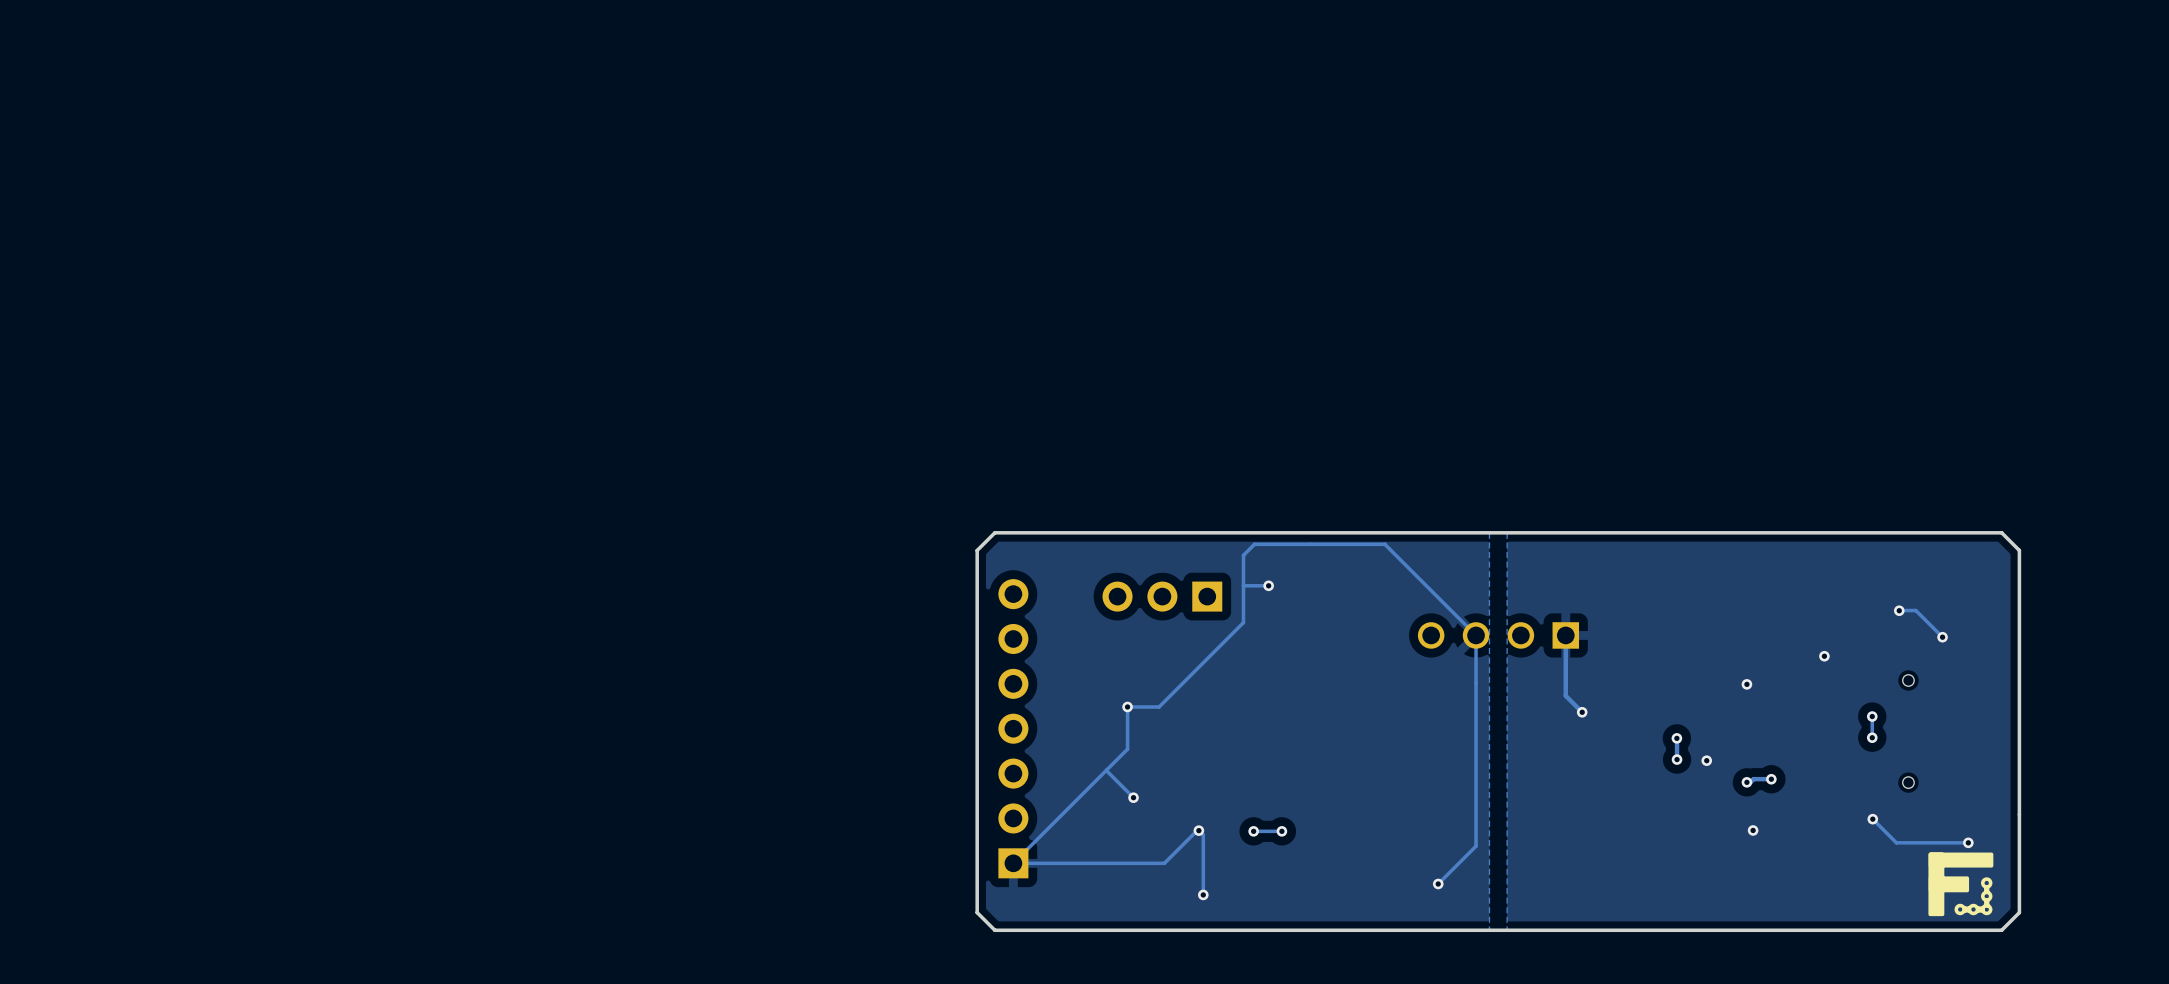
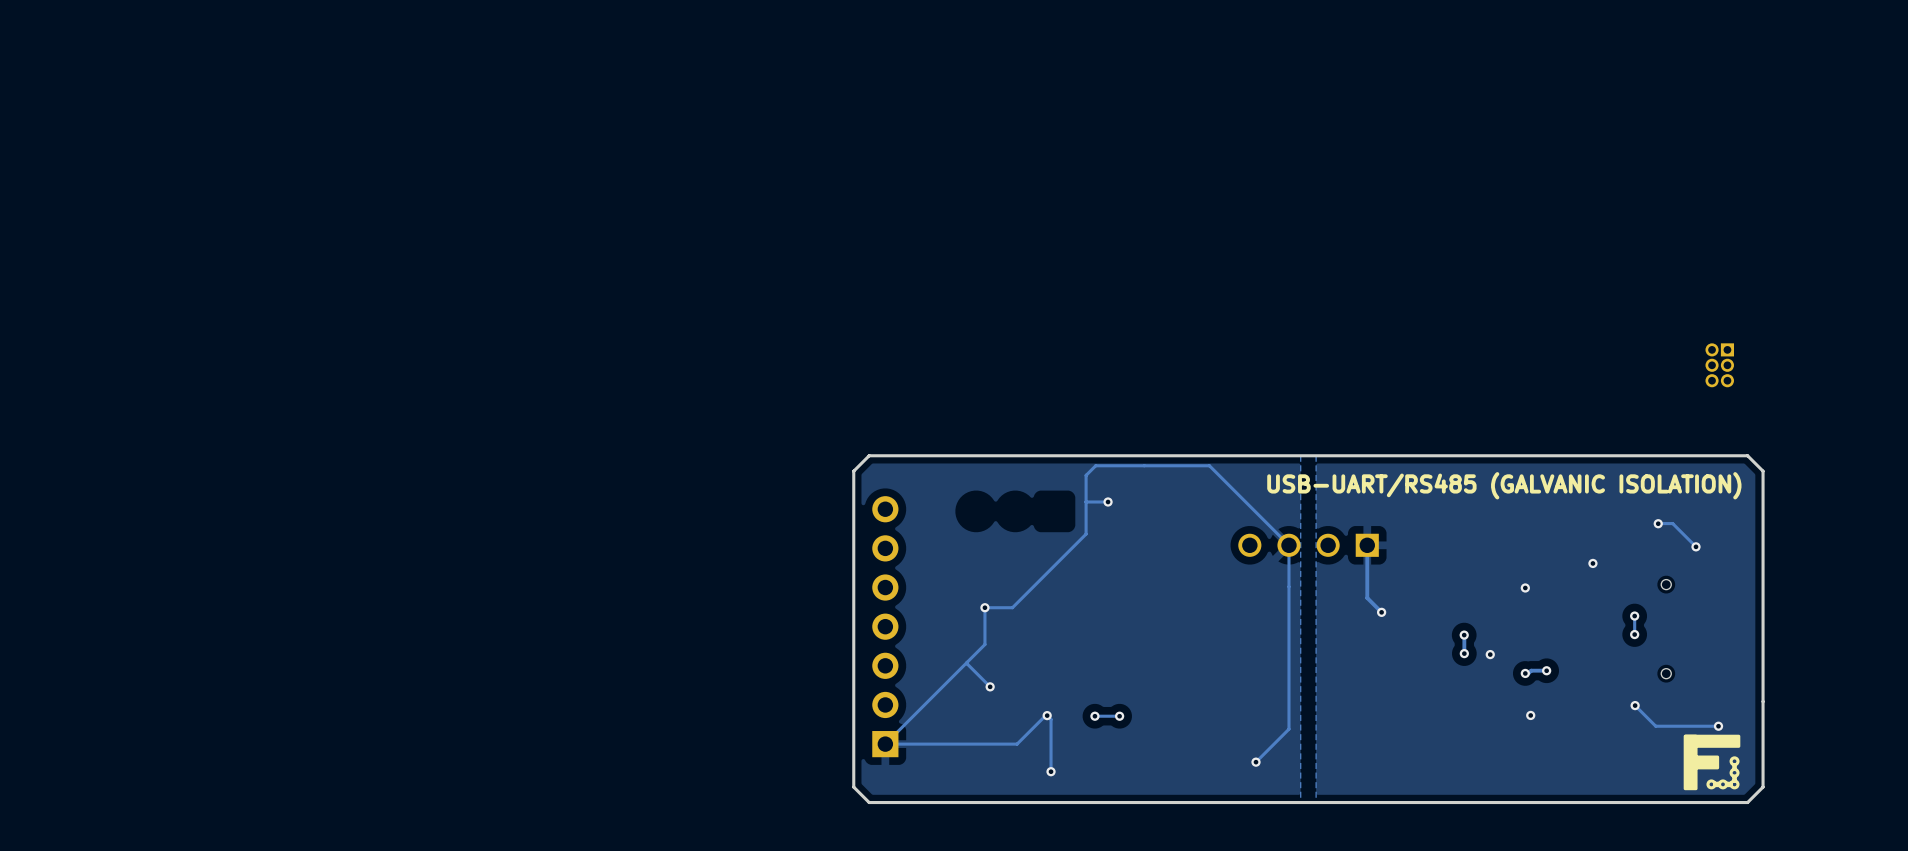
part: none -> (1719, 365)
text: none -> USB-UART/RS485 (GALVANIC ISOLATION) (1504, 485)
part: (1162, 596) -> none

